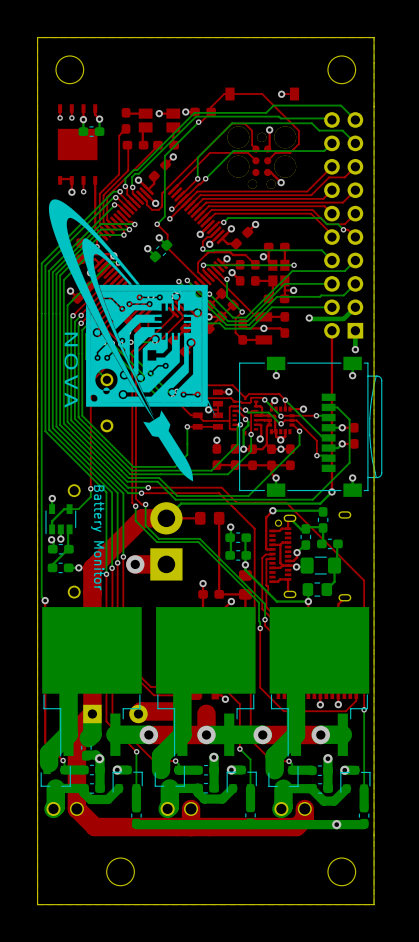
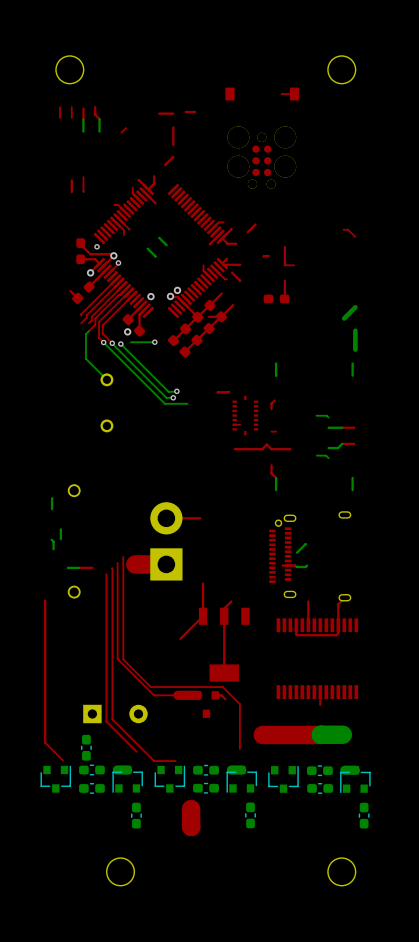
board edge: (374, 37) (374, 904) (37, 904) (37, 37) (374, 37) -> none
via: (281, 94) -> none
via: (185, 112) -> none
part: (203, 112) -> none
top track: (145, 113) (126, 113) -> none
via: (159, 113) -> none
via: (60, 117) -> none
via: (71, 117) -> none
via: (83, 119) -> none
via: (99, 119) -> none
bottom track: (331, 119) (280, 118) (278, 116) (196, 116) (138, 173) (135, 173) (132, 177) (132, 187) -> none
bottom track: (355, 119) (340, 105) (273, 105) (266, 112) (194, 112) (137, 170) (133, 170) (125, 178) (125, 186) -> none
part: (126, 120) -> none
part: (159, 120) -> none
bottom track: (198, 122) (164, 155) (164, 216) (157, 224) -> none
top track: (198, 122) (211, 112) (211, 107) (224, 94) (262, 94) (298, 130) (298, 143) (289, 152) (275, 152) (267, 160) -> none
via: (198, 122) -> none
top track: (145, 127) (142, 130) (142, 145) -> none
top track: (126, 128) (119, 135) (119, 174) (99, 193) (99, 225) (105, 231) -> none
top track: (269, 129) (269, 147) (267, 149) -> none
via: (269, 129) -> none
part: (91, 131) -> none
bottom track: (331, 143) (324, 151) (233, 151) (205, 178) -> none
bottom track: (355, 143) (342, 130) (319, 130) (311, 123) (232, 123) (197, 157) (197, 178) -> none
part: (77, 144) -> none
top track: (128, 145) (128, 170) (103, 195) (103, 222) (109, 228) -> none
part: (135, 145) -> none
top track: (158, 145) (107, 196) (107, 220) (112, 225) -> none
part: (166, 145) -> none
top track: (255, 149) (252, 145) (252, 130) (244, 123) (231, 123) (162, 193) (162, 206) (158, 209) (152, 209) (141, 196) -> none
via: (173, 156) -> none
top track: (255, 160) (248, 152) (210, 152) (173, 189) -> none
top track: (331, 166) (307, 191) (197, 191) (186, 202) -> none
top track: (355, 166) (344, 177) (329, 177) (311, 195) (200, 195) (189, 205) -> none
part: (159, 170) -> none
top track: (267, 172) (271, 172) (281, 182) -> none
top track: (197, 178) (179, 196) -> none
via: (197, 178) -> none
top track: (205, 178) (171, 209) -> none
via: (205, 178) -> none
top track: (71, 179) (60, 179) -> none
top track: (95, 180) (95, 227) (102, 235) -> none
via: (138, 180) -> none
via: (281, 182) -> none
top track: (125, 186) (127, 194) (135, 202) -> none
via: (125, 186) -> none
via: (132, 187) -> none
top track: (331, 190) (323, 198) (203, 198) (192, 208) -> none
top track: (355, 190) (343, 202) (206, 202) (196, 212) -> none
via: (83, 191) -> none
bottom track: (120, 191) (113, 191) (41, 263) (41, 597) (45, 600) -> none
top track: (120, 191) (132, 205) -> none
via: (120, 191) -> none
via: (71, 192) -> none
bottom track: (115, 197) (113, 197) (45, 265) (45, 431) (106, 492) (106, 574) -> none
top track: (115, 197) (128, 209) -> none
via: (115, 197) -> none
drawing: [48, 199, 216, 482] -> none
top track: (187, 202) (169, 218) -> none
via: (155, 203) -> none
bottom track: (114, 204) (49, 270) (49, 429) (112, 492) (112, 568) -> none
via: (114, 204) -> none
via: (171, 209) -> none
top track: (331, 213) (324, 206) (208, 206) (199, 215) -> none
top track: (355, 213) (344, 224) (326, 224) (312, 209) (211, 209) (202, 218) -> none
top track: (122, 215) (134, 224) -> none
via: (169, 218) -> none
top track: (206, 222) (215, 213) (311, 213) (331, 234) (331, 237) -> none
bottom track: (223, 222) (228, 218) (320, 218) (326, 224) (337, 224) (343, 229) -> none
via: (223, 222) -> none
bottom track: (134, 224) (101, 224) (52, 272) (52, 428) (117, 492) (117, 562) -> none
via: (134, 224) -> none
top track: (157, 224) (167, 234) (167, 247) (202, 283) -> none
via: (157, 224) -> none
via: (255, 224) -> none
part: (343, 225) -> none
via: (231, 228) -> none
bottom track: (129, 229) (100, 229) (56, 273) (56, 426) (123, 493) (123, 556) -> none
via: (129, 229) -> none
via: (343, 229) -> none
top track: (215, 231) (202, 241) (202, 248) -> none
via: (200, 234) -> none
bottom track: (123, 235) (100, 235) (60, 275) (60, 425) (128, 493) (141, 493) -> none
via: (123, 235) -> none
via: (159, 237) -> none
top track: (99, 238) (97, 240) (97, 246) -> none
part: (241, 238) -> none
via: (209, 244) -> none
bottom track: (97, 246) (63, 280) (63, 423) (128, 487) (148, 487) -> none
top track: (268, 247) (268, 261) (272, 265) -> none
part: (276, 247) -> none
via: (147, 248) -> none
bottom track: (202, 248) (204, 250) (321, 250) (331, 260) -> none
via: (202, 248) -> none
part: (161, 250) -> none
via: (263, 256) -> none
via: (227, 258) -> none
bottom track: (355, 260) (344, 271) (292, 271) (245, 317) (233, 317) (209, 294) -> none
bottom track: (118, 262) (110, 262) (67, 305) (67, 421) (127, 481) (157, 481) (175, 499) (312, 499) (349, 462) (349, 419) (337, 407) (328, 407) -> none
top track: (255, 264) (245, 255) (233, 255) (230, 252) (208, 252) (197, 262) (197, 271) (206, 279) -> none
via: (203, 265) -> none
bottom track: (294, 265) (203, 265) -> none
via: (294, 265) -> none
via: (232, 272) -> none
part: (240, 272) -> none
part: (255, 272) -> none
top track: (212, 273) (256, 316) (284, 316) -> none
part: (278, 273) -> none
top track: (112, 276) (73, 315) -> none
bottom track: (227, 279) (227, 296) (242, 312) -> none
via: (227, 279) -> none
bottom track: (187, 280) (228, 321) (247, 321) (284, 283) (331, 283) -> none
via: (187, 280) -> none
top track: (255, 280) (272, 280) (272, 294) (268, 298) -> none
bottom track: (178, 281) (183, 286) (187, 286) (226, 324) (248, 324) (277, 296) (343, 295) (355, 283) -> none
via: (178, 281) -> none
top track: (293, 290) (284, 290) -> none
via: (293, 290) -> none
via: (70, 291) -> none
via: (209, 294) -> none
top track: (135, 299) (106, 327) (119, 344) -> none
part: (227, 299) -> none
bottom track: (198, 305) (198, 316) (205, 323) (219, 323) (225, 328) (250, 328) (271, 307) (331, 307) -> none
top track: (176, 309) (182, 315) (182, 318) (158, 342) (154, 342) -> none
top track: (148, 312) (148, 335) (132, 351) (132, 502) (135, 506) -> none
top track: (173, 312) (173, 315) (135, 353) (135, 498) (141, 504) (145, 504) -> none
top track: (242, 312) (235, 318) (235, 332) (242, 339) (263, 339) -> none
via: (242, 312) -> none
bottom track: (73, 315) (71, 317) (71, 420) (128, 477) (159, 477) (177, 495) (248, 495) (299, 444) (299, 431) -> none
via: (73, 315) -> none
bottom track: (81, 315) (74, 321) (74, 418) (130, 474) (228, 474) (251, 451) (251, 434) -> none
via: (81, 315) -> none
via: (209, 316) -> none
via: (309, 318) -> none
bottom track: (344, 318) (309, 318) -> none
bottom track: (81, 323) (78, 325) (78, 417) (131, 470) (211, 470) (237, 444) (237, 427) (240, 424) -> none
via: (81, 323) -> none
bottom track: (88, 323) (82, 329) (82, 415) (133, 466) (175, 466) (187, 454) (187, 426) -> none
top track: (242, 323) (247, 328) (280, 328) (284, 333) -> none
part: (284, 324) -> none
part: (263, 328) -> none
via: (263, 328) -> none
top track: (331, 330) (331, 491) -> none
part: (242, 331) -> none
top track: (130, 342) (90, 382) (90, 488) -> none
via: (130, 342) -> none
via: (355, 349) -> none
via: (276, 375) -> none
via: (352, 375) -> none
top track: (176, 391) (197, 392) (204, 385) (232, 385) (245, 397) (249, 394) (279, 394) (285, 400) (285, 409) -> none
via: (228, 391) -> none
top track: (173, 398) (190, 415) (197, 415) (203, 420) (229, 420) -> none
bottom track: (264, 399) (280, 416) -> none
top track: (264, 399) (262, 397) (251, 397) (249, 402) (241, 402) (234, 401) (231, 398) (203, 398) (197, 403) (187, 403) -> none
via: (264, 399) -> none
via: (274, 400) -> none
bottom track: (285, 400) (323, 437) (328, 437) -> none
via: (285, 400) -> none
top track: (256, 401) (256, 406) (262, 407) (262, 415) -> none
top track: (218, 403) (218, 415) -> none
part: (207, 409) -> none
via: (208, 409) -> none
top track: (218, 409) (208, 409) -> none
top track: (303, 409) (289, 409) -> none
via: (303, 409) -> none
top track: (234, 410) (237, 410) (245, 419) -> none
bottom track: (245, 410) (248, 412) (268, 412) (281, 423) (279, 423) -> none
top track: (245, 410) (239, 406) (229, 407) (229, 428) (234, 429) -> none
via: (245, 410) -> none
top track: (256, 410) (251, 411) (251, 434) -> none
top track: (256, 415) (275, 416) (276, 437) (284, 437) (285, 431) -> none
top track: (316, 415) (280, 416) -> none
via: (316, 415) -> none
via: (280, 416) -> none
bottom track: (245, 419) (248, 425) (243, 430) (243, 449) -> none
via: (245, 419) -> none
top track: (256, 420) (269, 420) (269, 424) (266, 426) (266, 444) -> none
part: (280, 420) -> none
top track: (281, 423) (285, 420) (296, 420) (316, 440) (316, 455) -> none
via: (281, 423) -> none
via: (240, 424) -> none
top track: (256, 424) (261, 425) (260, 439) -> none
top track: (292, 424) (299, 431) -> none
via: (187, 426) -> none
top track: (218, 426) (187, 426) -> none
part: (310, 426) -> none
via: (342, 427) -> none
via: (299, 431) -> none
via: (251, 434) -> none
part: (354, 435) -> none
via: (260, 439) -> none
via: (280, 439) -> none
via: (216, 440) -> none
via: (342, 443) -> none
via: (243, 449) -> none
via: (280, 449) -> none
via: (316, 455) -> none
part: (216, 457) -> none
part: (235, 457) -> none
part: (252, 457) -> none
part: (271, 457) -> none
part: (290, 457) -> none
top track: (216, 465) (290, 465) -> none
via: (276, 477) -> none
via: (352, 477) -> none
top track: (148, 487) (221, 487) (236, 502) (286, 502) (364, 580) (364, 709) -> none
via: (148, 487) -> none
bottom track: (90, 488) (90, 496) (78, 509) (64, 509) (52, 521) (52, 529) -> none
via: (90, 488) -> none
bottom track: (331, 491) (320, 503) (181, 503) (166, 518) -> none
via: (331, 491) -> none
top track: (141, 493) (219, 493) (254, 528) (254, 623) (250, 627) (250, 739) (272, 761) (289, 761) -> none
via: (141, 493) -> none
via: (52, 498) -> none
bottom track: (145, 504) (145, 525) (158, 538) (199, 538) (265, 604) (265, 619) -> none
via: (145, 504) -> none
bottom track: (135, 506) (135, 520) (156, 542) (198, 542) (259, 602) (260, 628) -> none
via: (135, 506) -> none
bottom track: (272, 510) (321, 510) (323, 512) -> none
top track: (272, 510) (266, 517) (266, 548) (272, 549) -> none
via: (272, 510) -> none
top track: (165, 518) (142, 518) (92, 567) (92, 714) (76, 729) (76, 808) (95, 827) (296, 827) (304, 818) (304, 808) -> none
part: (209, 518) -> none
top track: (219, 518) (219, 594) (245, 594) (245, 616) -> none
bottom track: (290, 518) (301, 529) (305, 529) (308, 527) (323, 527) (322, 543) -> none
top track: (290, 518) (288, 520) (288, 528) (272, 531) -> none
Battery Monitor: (60, 519) -> none
part: (323, 519) -> none
bottom track: (230, 527) (230, 555) -> none
via: (230, 527) -> none
bottom track: (69, 529) (68, 549) (53, 563) (53, 567) -> none
part: (305, 536) -> none
part: (238, 537) -> none
bottom track: (245, 537) (245, 570) (276, 601) (308, 601) (307, 589) -> none
via: (51, 539) -> none
via: (60, 539) -> none
top track: (288, 542) (282, 542) (280, 544) -> none
part: (329, 543) -> none
bottom track: (337, 543) (337, 562) (334, 565) -> none
top track: (280, 544) (272, 544) -> none
top track: (280, 544) (280, 563) (282, 565) (280, 567) (272, 567) -> none
part: (60, 549) -> none
top track: (297, 552) (297, 557) (293, 560) (288, 560) -> none
via: (297, 552) -> none
top track: (272, 554) (265, 554) (262, 557) (262, 609) (278, 625) -> none
part: (238, 555) -> none
via: (123, 556) -> none
top track: (272, 558) (266, 559) (266, 585) (268, 586) (266, 607) (274, 615) (283, 616) (284, 625) -> none
via: (117, 562) -> none
via: (135, 564) -> none
via: (245, 564) -> none
part: (320, 565) -> none
bottom track: (334, 565) (334, 581) (326, 589) -> none
via: (296, 566) -> none
part: (60, 567) -> none
via: (78, 567) -> none
via: (112, 568) -> none
via: (106, 574) -> none
top track: (272, 581) (288, 579) (288, 592) (290, 594) -> none
via: (203, 583) -> none
part: (245, 584) -> none
part: (317, 589) -> none
part: (211, 594) -> none
via: (45, 600) -> none
via: (231, 601) -> none
via: (308, 601) -> none
top track: (265, 619) (265, 625) (276, 636) -> none
via: (265, 619) -> none
top track: (260, 628) (260, 687) (283, 711) (345, 711) (356, 700) (356, 692) -> none
via: (260, 628) -> none
bottom track: (91, 650) (68, 673) (68, 734) (49, 753) (49, 763) -> none
bottom track: (205, 650) (182, 673) (182, 734) (161, 756) (161, 770) -> none
bottom track: (319, 650) (296, 673) (296, 734) (274, 756) (274, 770) -> none
part: (91, 681) -> none
part: (205, 681) -> none
part: (319, 681) -> none
via: (225, 699) -> none
via: (320, 704) -> none
via: (338, 704) -> none
bottom track: (364, 709) (364, 807) -> none
via: (364, 709) -> none
top track: (177, 711) (141, 711) (138, 714) -> none
top track: (206, 713) (206, 734) (148, 734) -> none
bottom track: (92, 714) (92, 734) (88, 738) -> none
bottom track: (115, 734) (148, 734) -> none
via: (148, 734) -> none
via: (206, 734) -> none
bottom track: (262, 734) (206, 734) -> none
via: (262, 734) -> none
via: (320, 734) -> none
bottom track: (239, 749) (250, 759) (250, 807) -> none
via: (239, 749) -> none
bottom track: (136, 751) (136, 807) -> none
via: (136, 751) -> none
bottom track: (86, 755) (95, 755) (100, 759) (100, 788) -> none
bottom track: (213, 757) (214, 787) -> none
via: (213, 757) -> none
via: (99, 758) -> none
bottom track: (327, 758) (328, 788) -> none
via: (327, 758) -> none
bottom track: (63, 760) (64, 770) (83, 770) -> none
via: (63, 760) -> none
bottom track: (175, 761) (178, 764) (178, 770) (197, 770) -> none
via: (175, 761) -> none
bottom track: (289, 761) (292, 764) (292, 770) (311, 770) -> none
via: (289, 761) -> none
via: (117, 770) -> none
via: (231, 770) -> none
via: (344, 770) -> none
bottom track: (118, 788) (107, 799) (90, 799) (83, 792) (83, 788) (55, 788) (55, 806) (53, 808) -> none
bottom track: (233, 788) (222, 799) (204, 799) (197, 792) (197, 788) (169, 788) (169, 806) (167, 808) -> none
bottom track: (346, 788) (334, 801) (323, 801) (312, 788) (283, 788) (283, 806) (281, 808) -> none
part: (65, 808) -> none
part: (179, 808) -> none
part: (293, 808) -> none
bottom track: (364, 823) (136, 823) -> none
via: (336, 824) -> none

